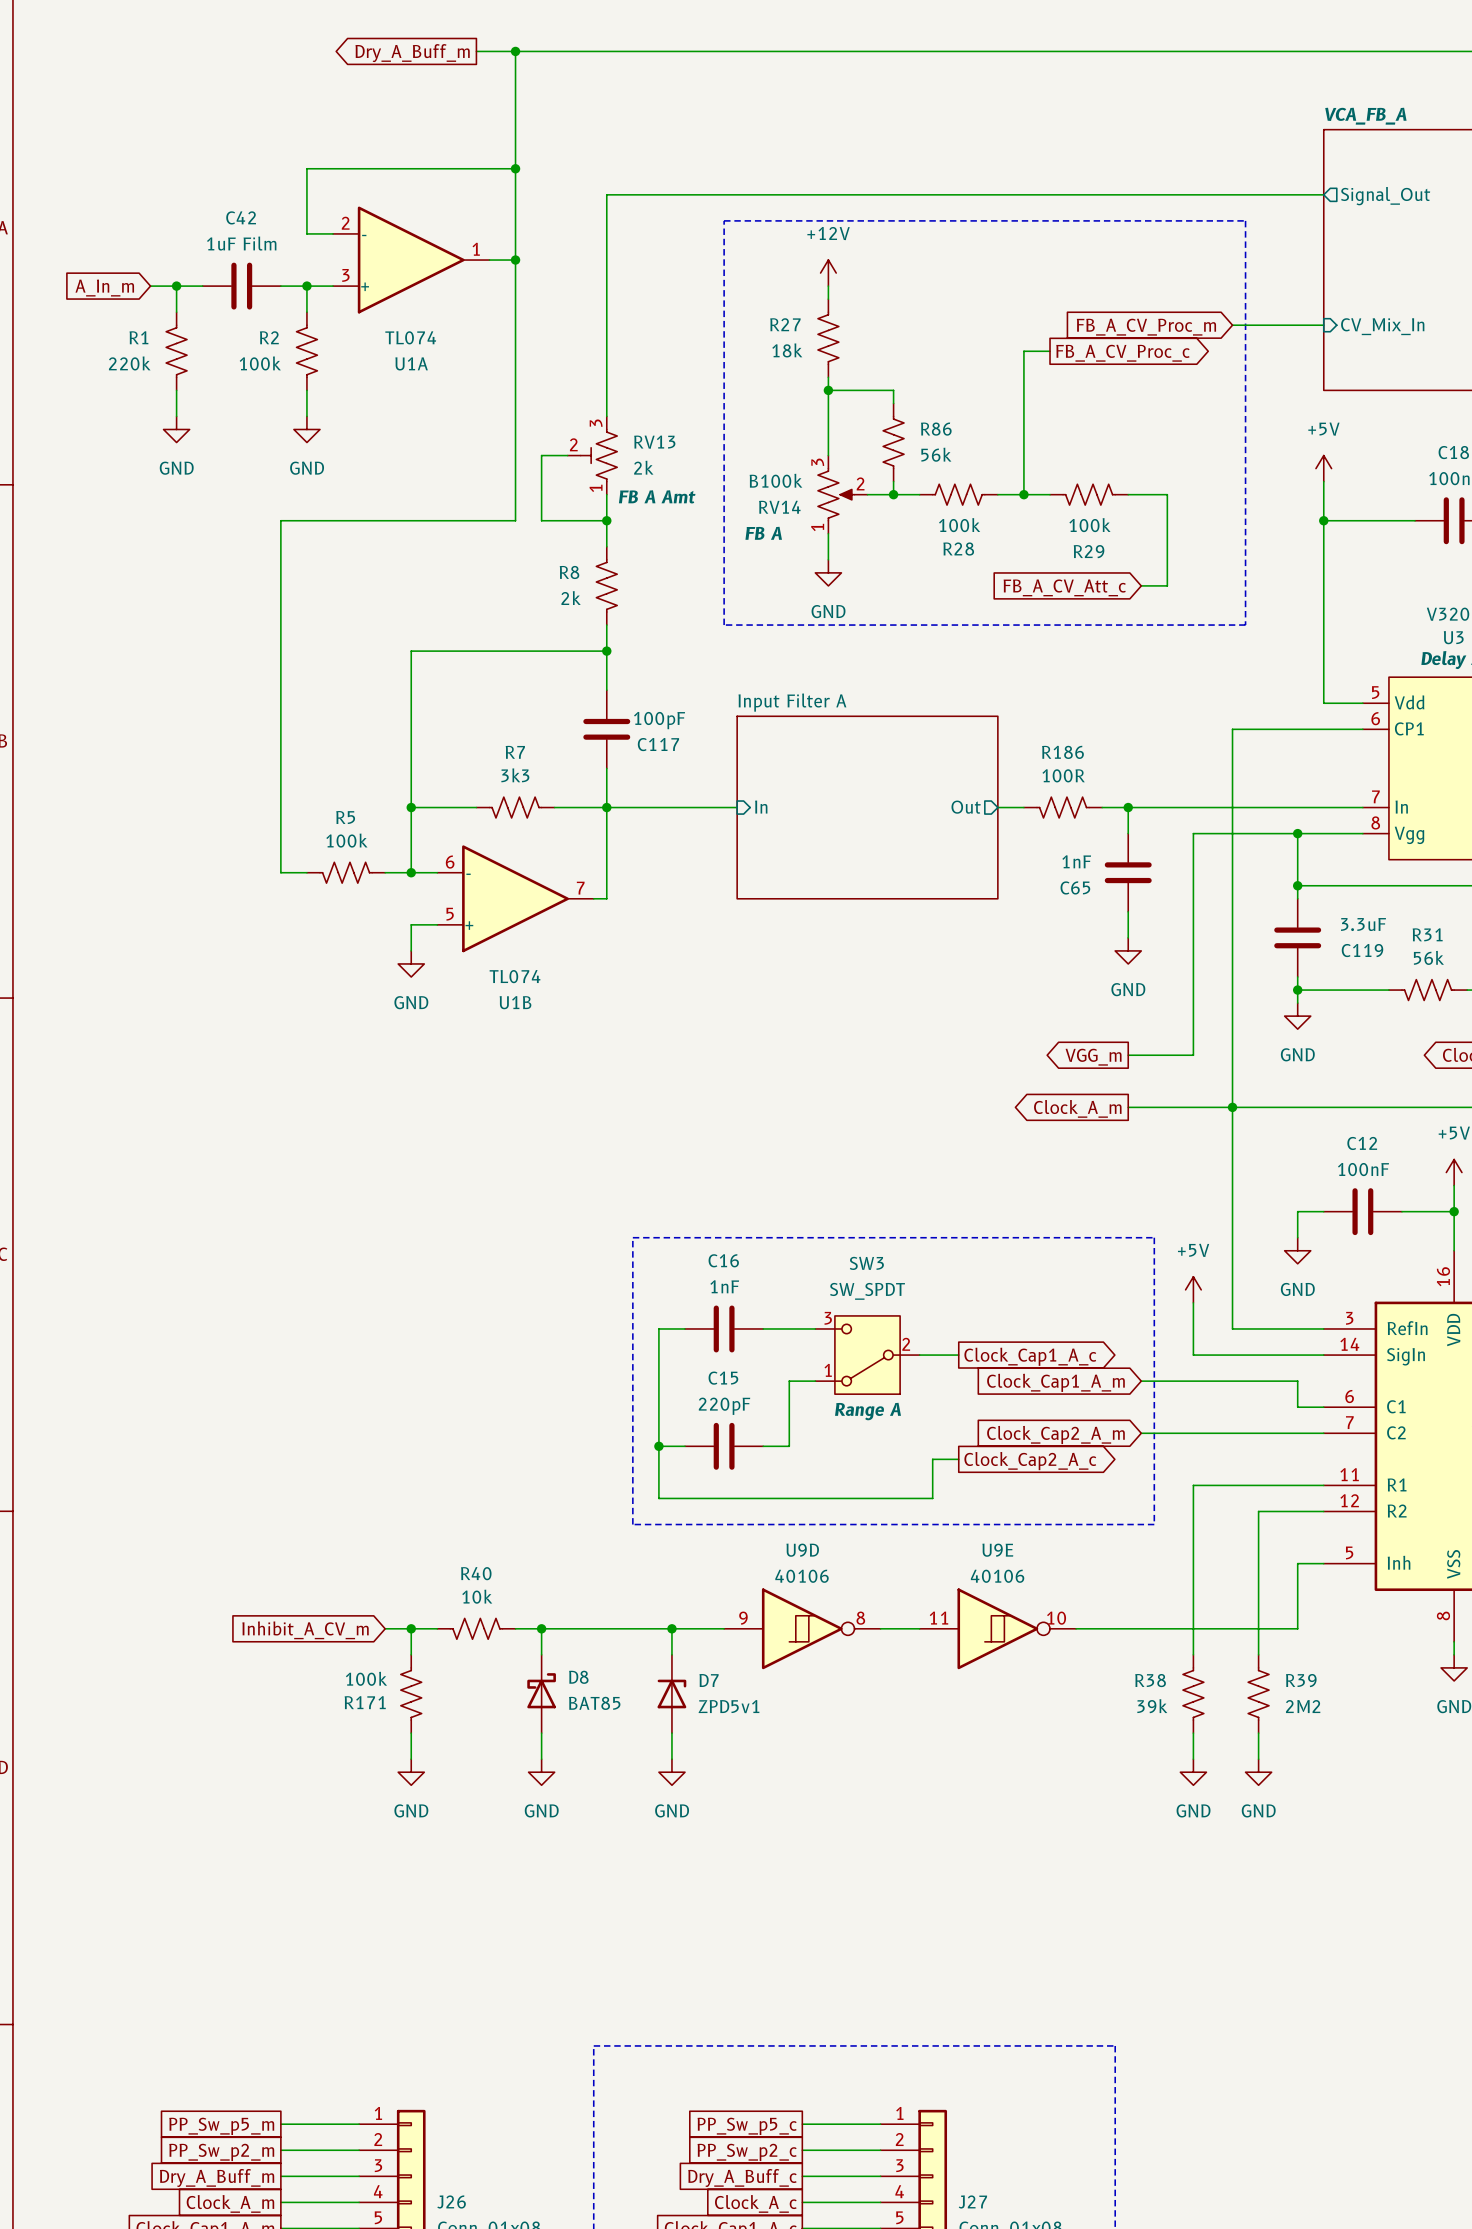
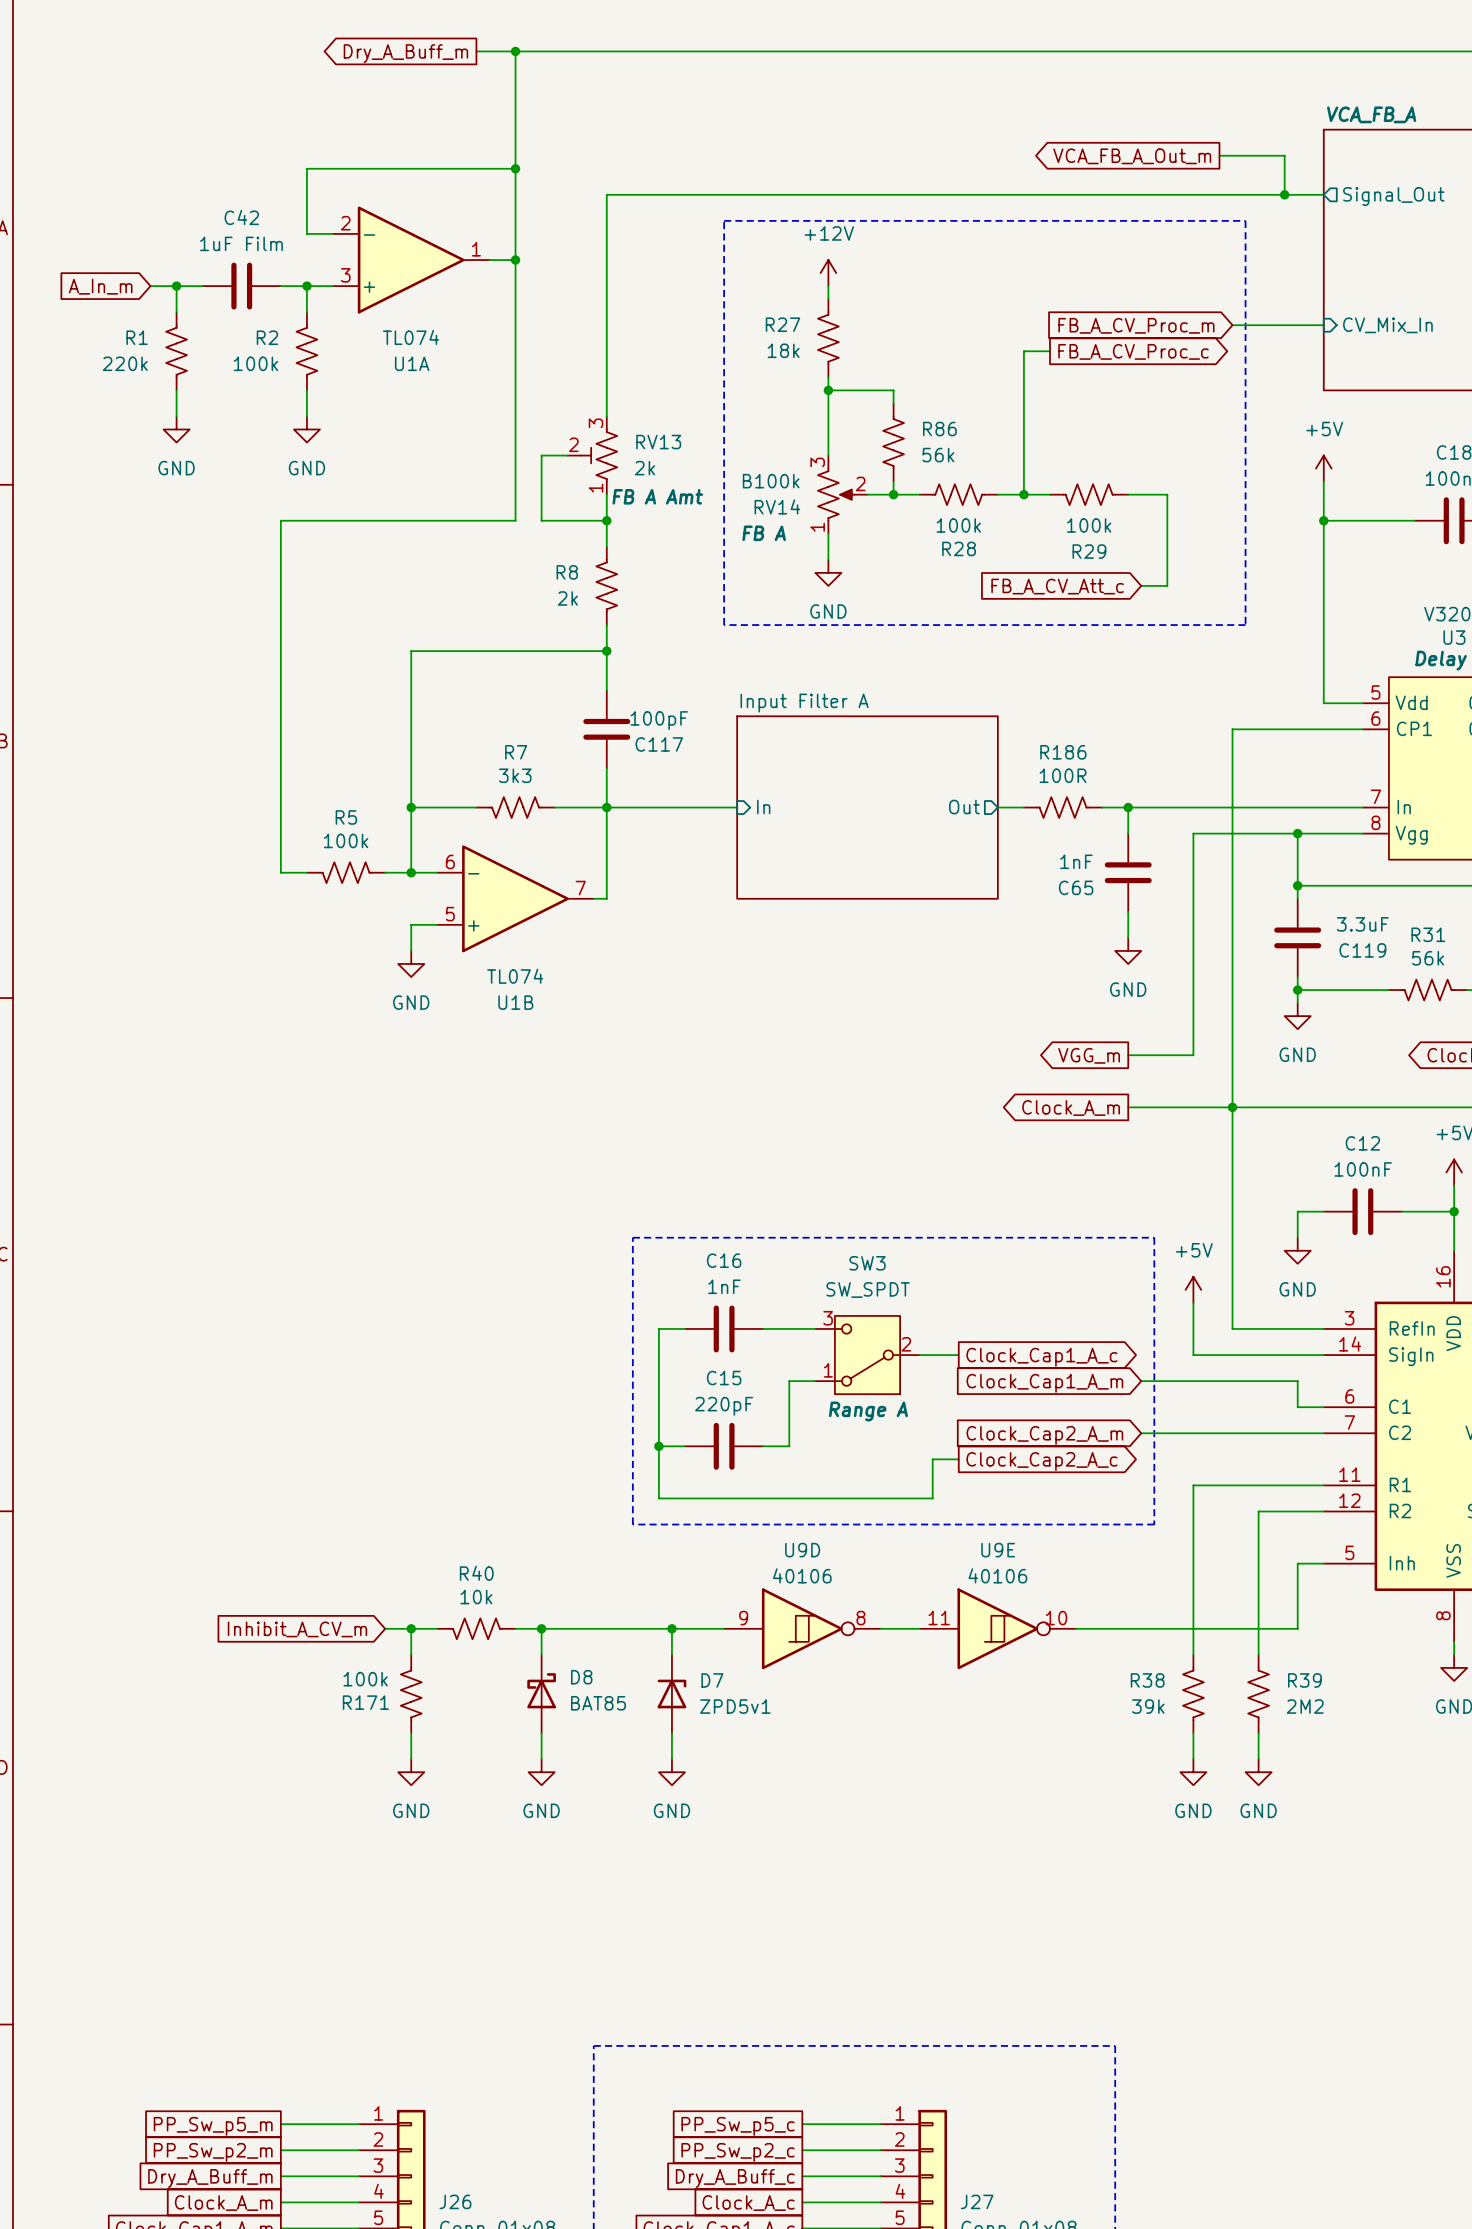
wire: none -> (1219, 155) (1284, 155) (1284, 194)
global label: none -> VCA_FB_A_Out_m (1132, 156)
junction: none -> (1284, 194)

